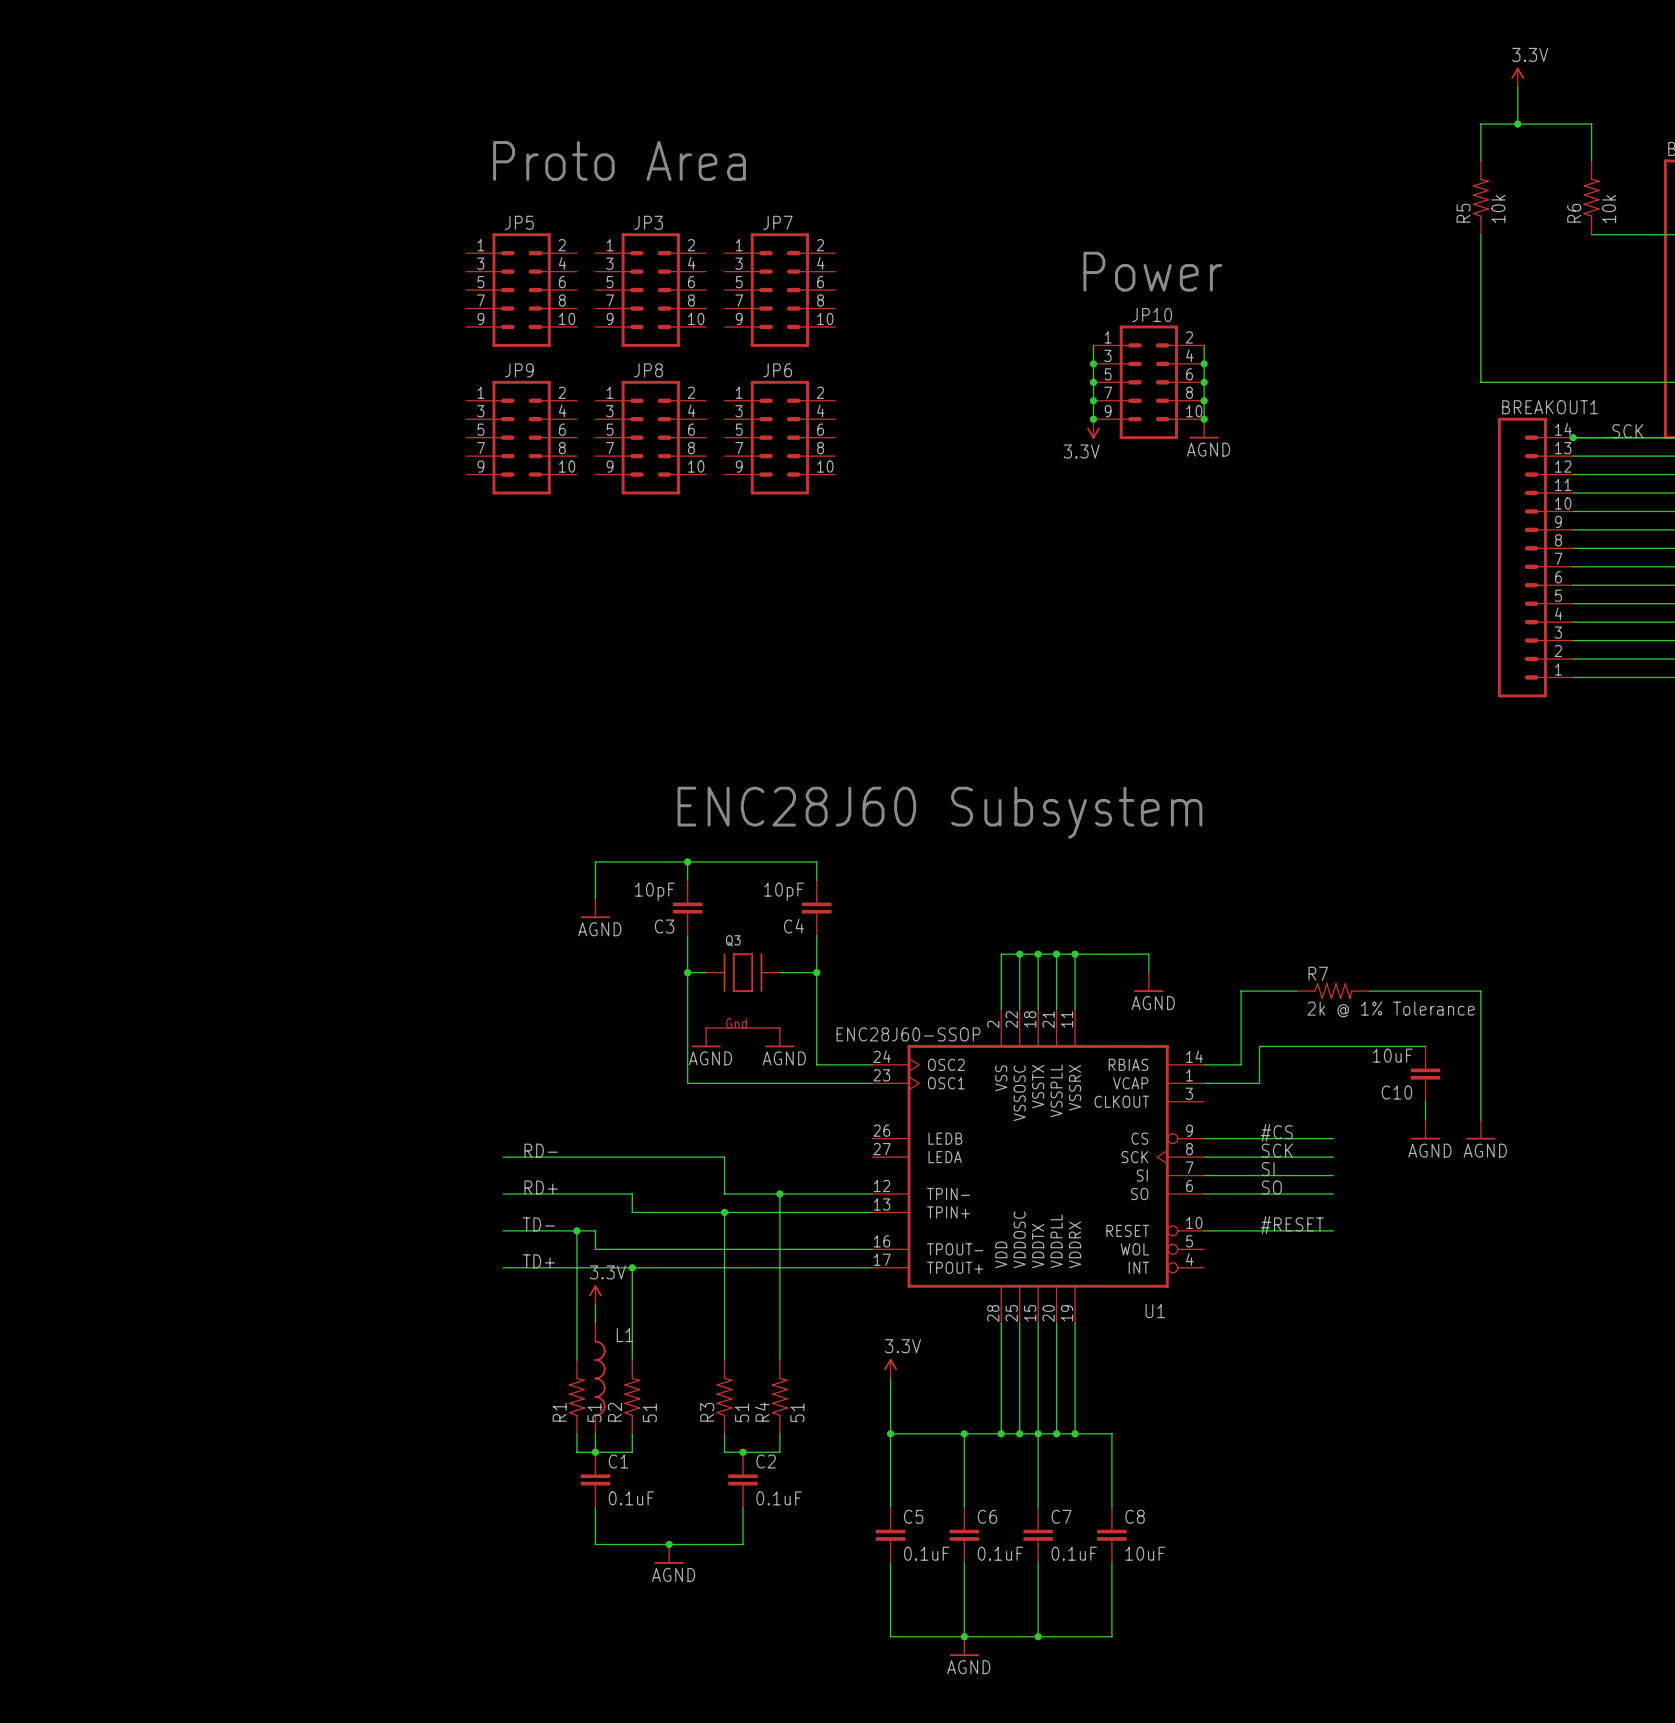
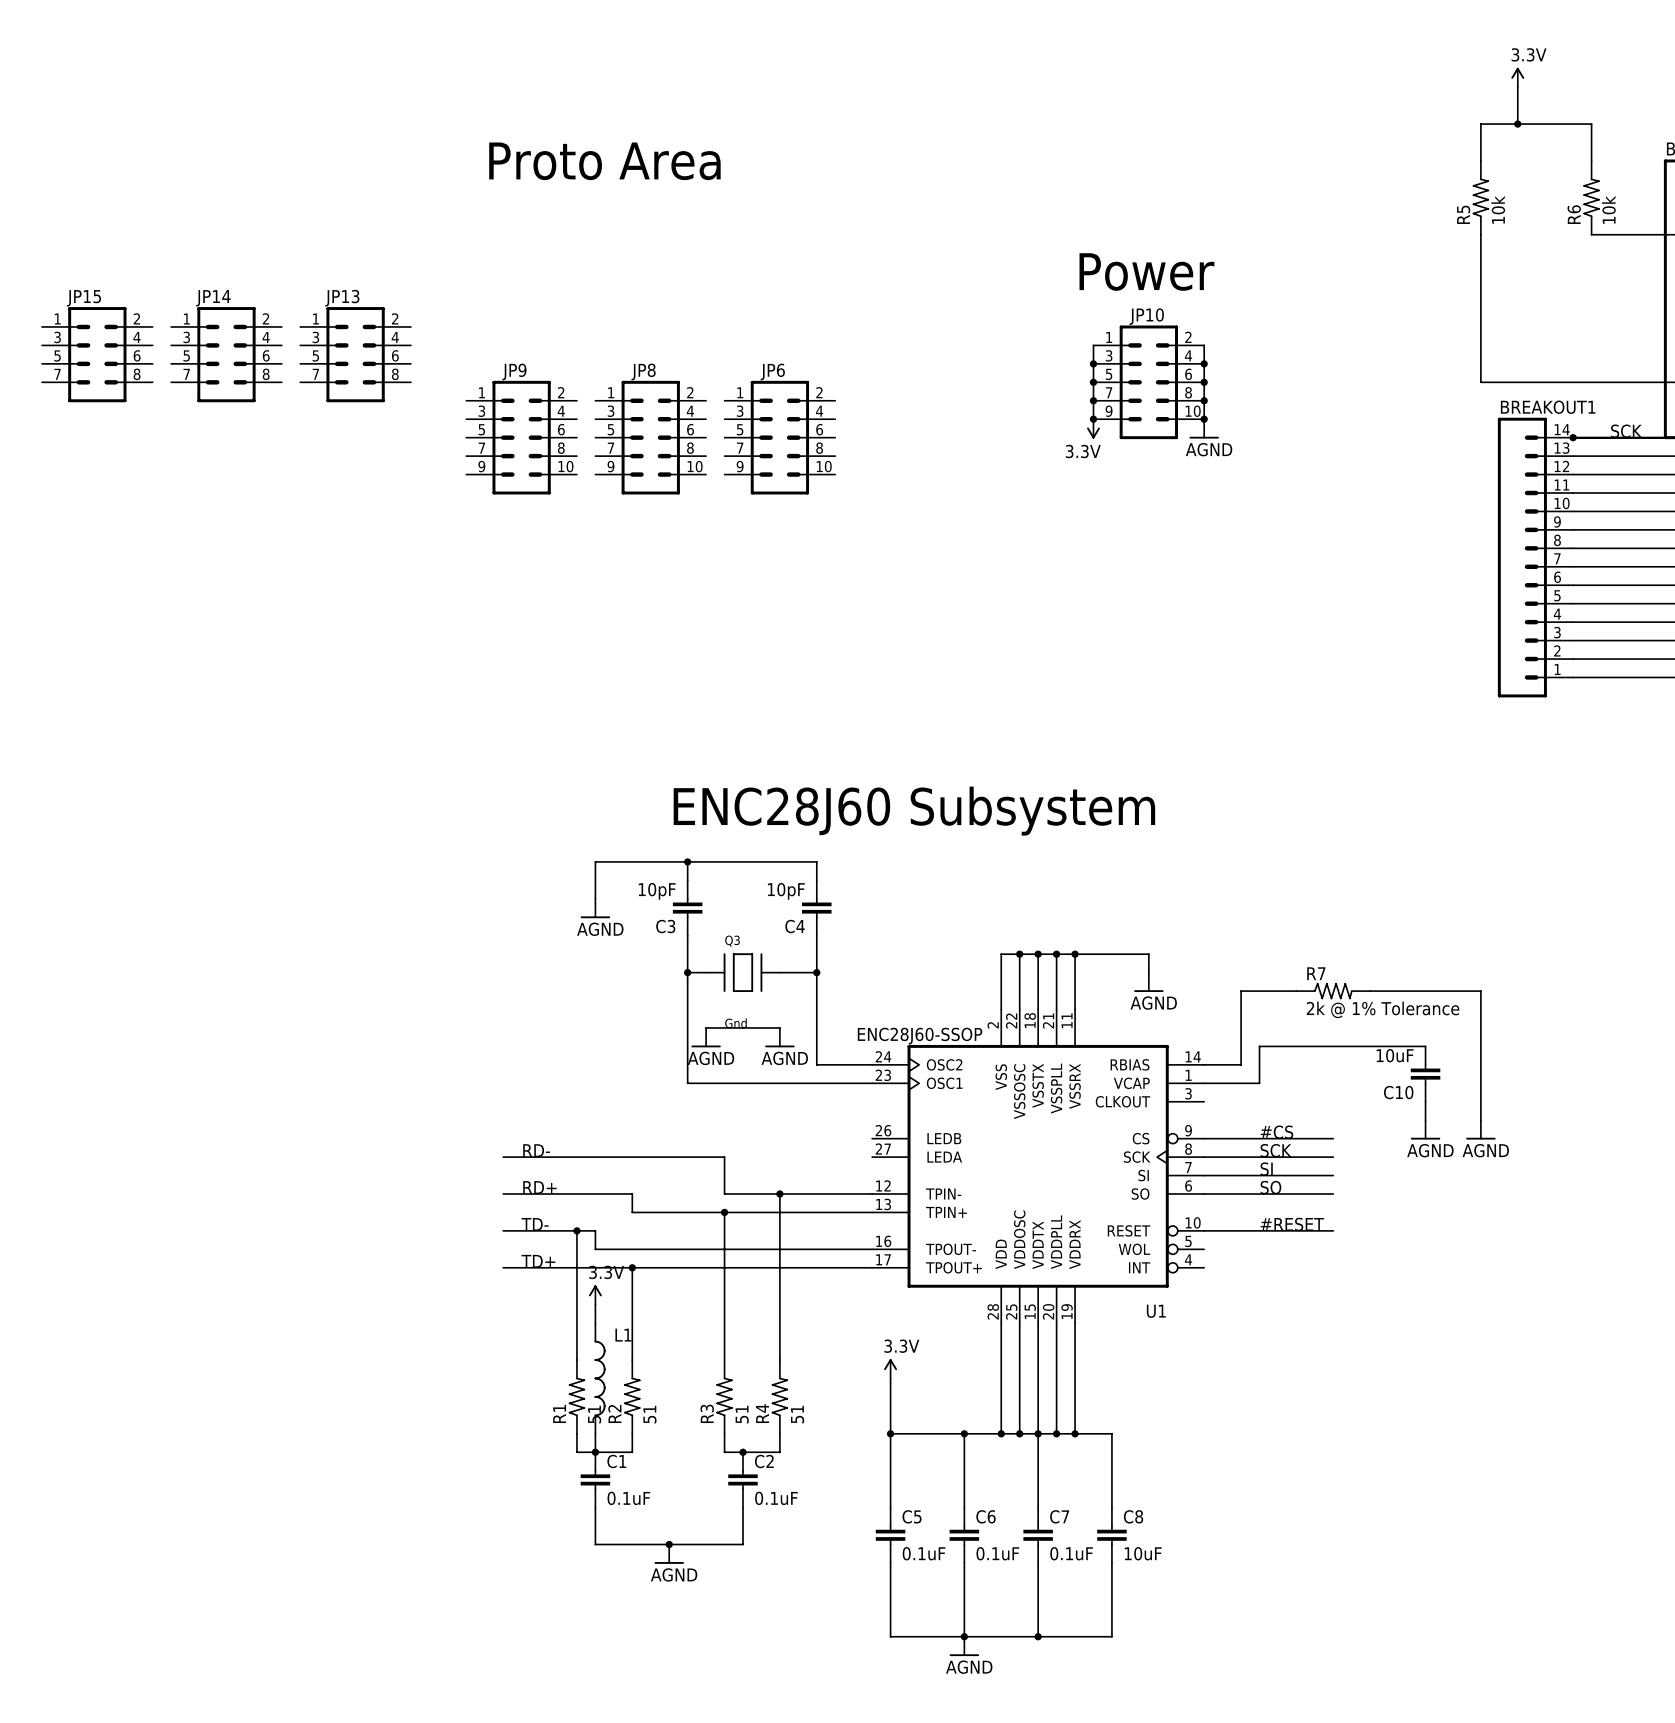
JP5: (521, 290) -> none
JP3: (650, 290) -> none
JP7: (779, 290) -> none
JP15: none -> (97, 354)
JP14: none -> (226, 354)
JP13: none -> (355, 354)

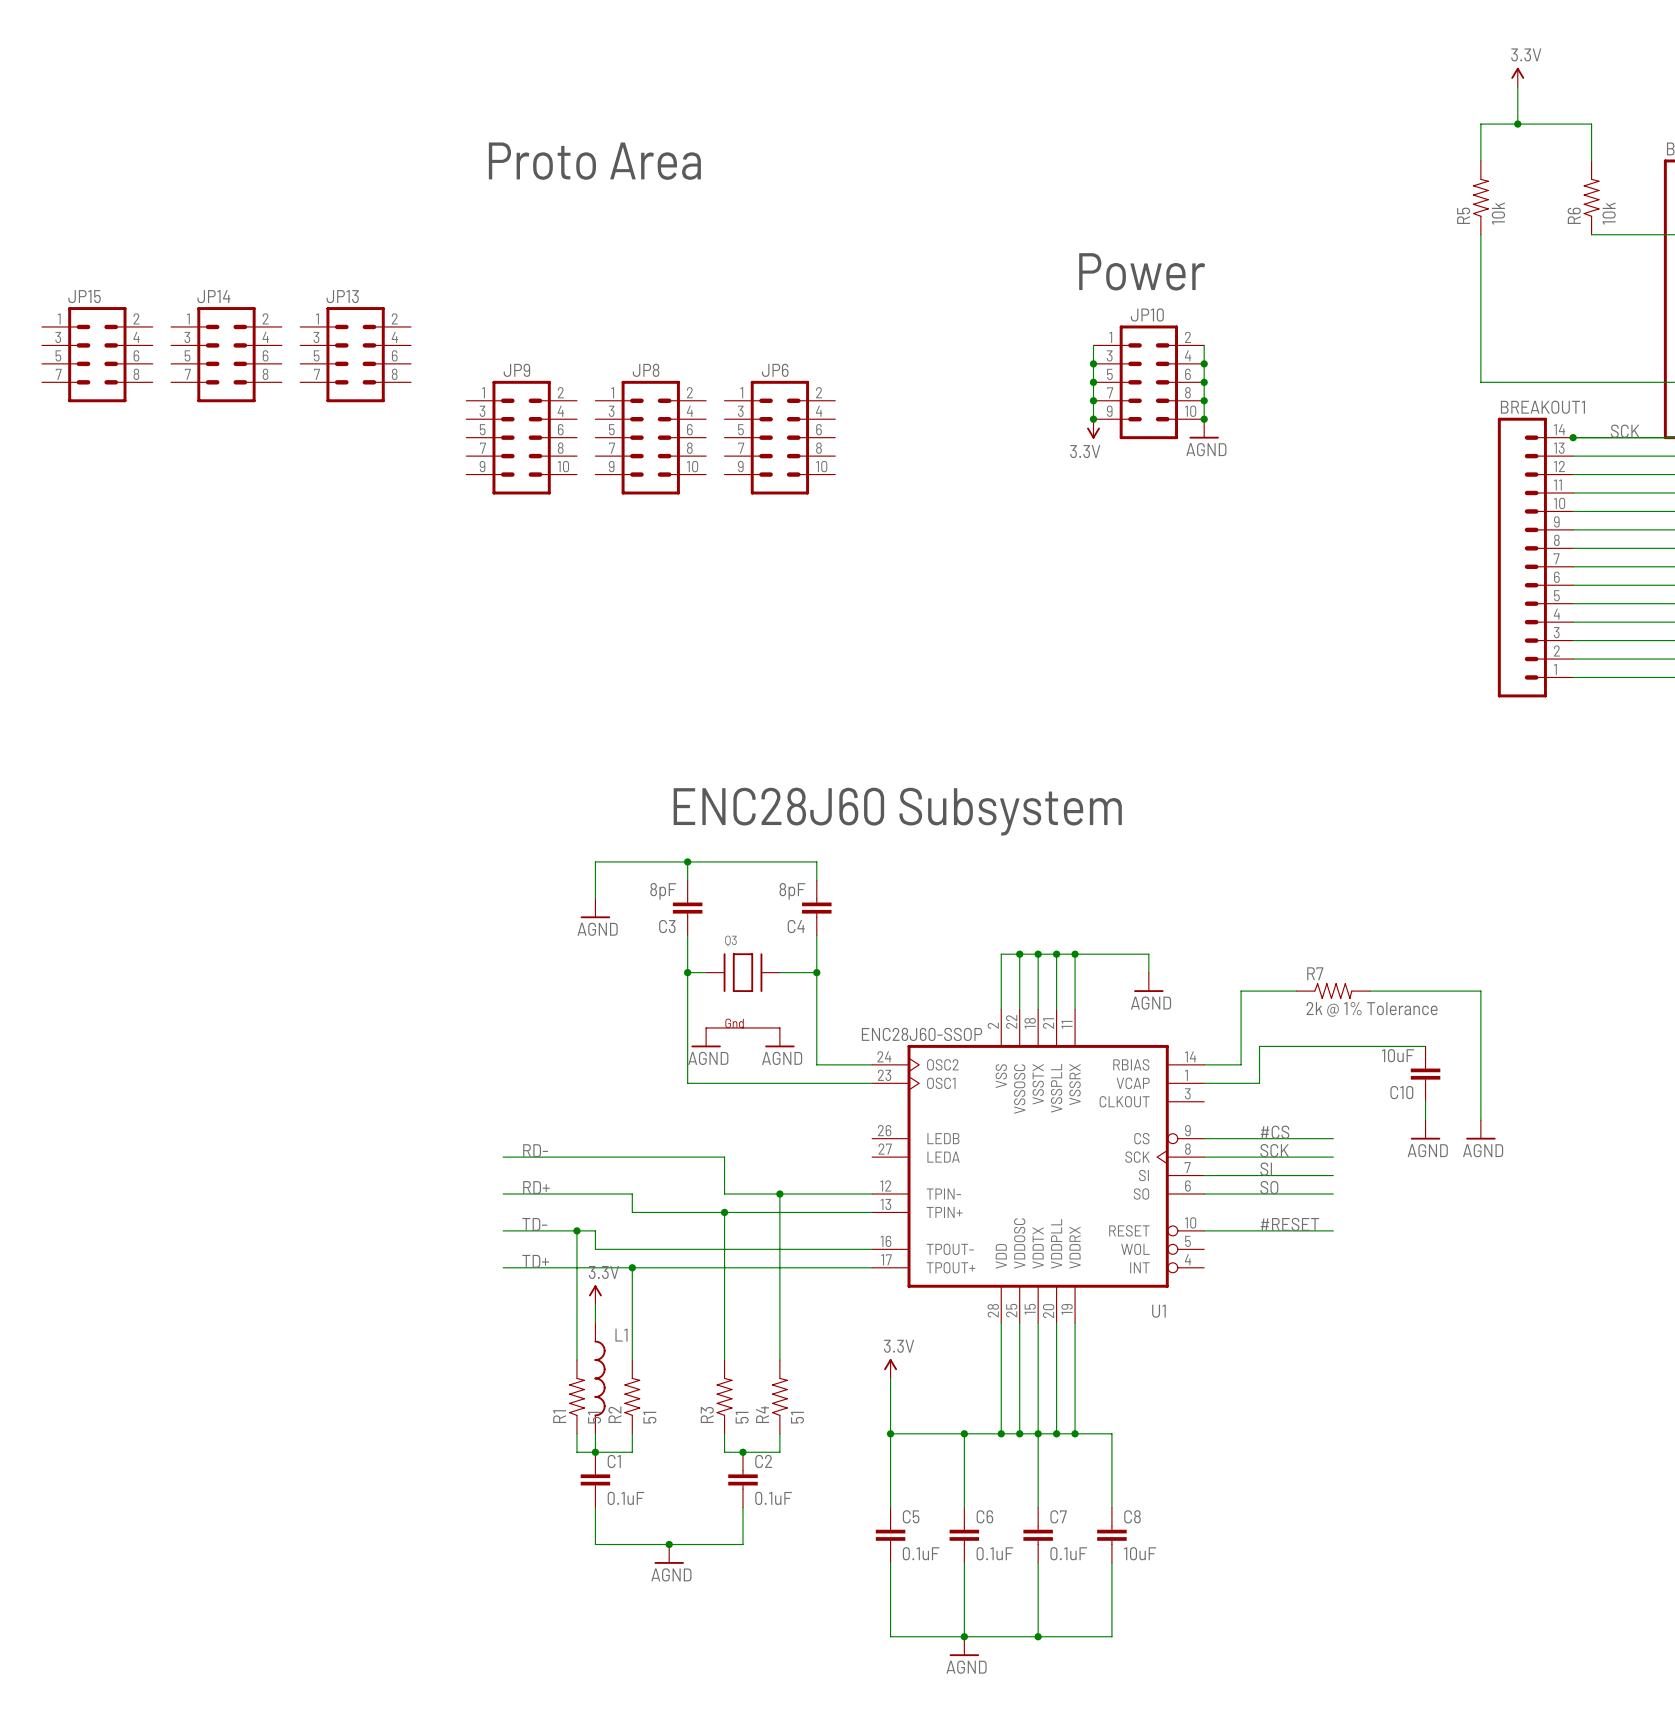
C3 value: 10pF (657, 891) -> 8pF (663, 891)
C4 value: 10pF (786, 891) -> 8pF (792, 891)

